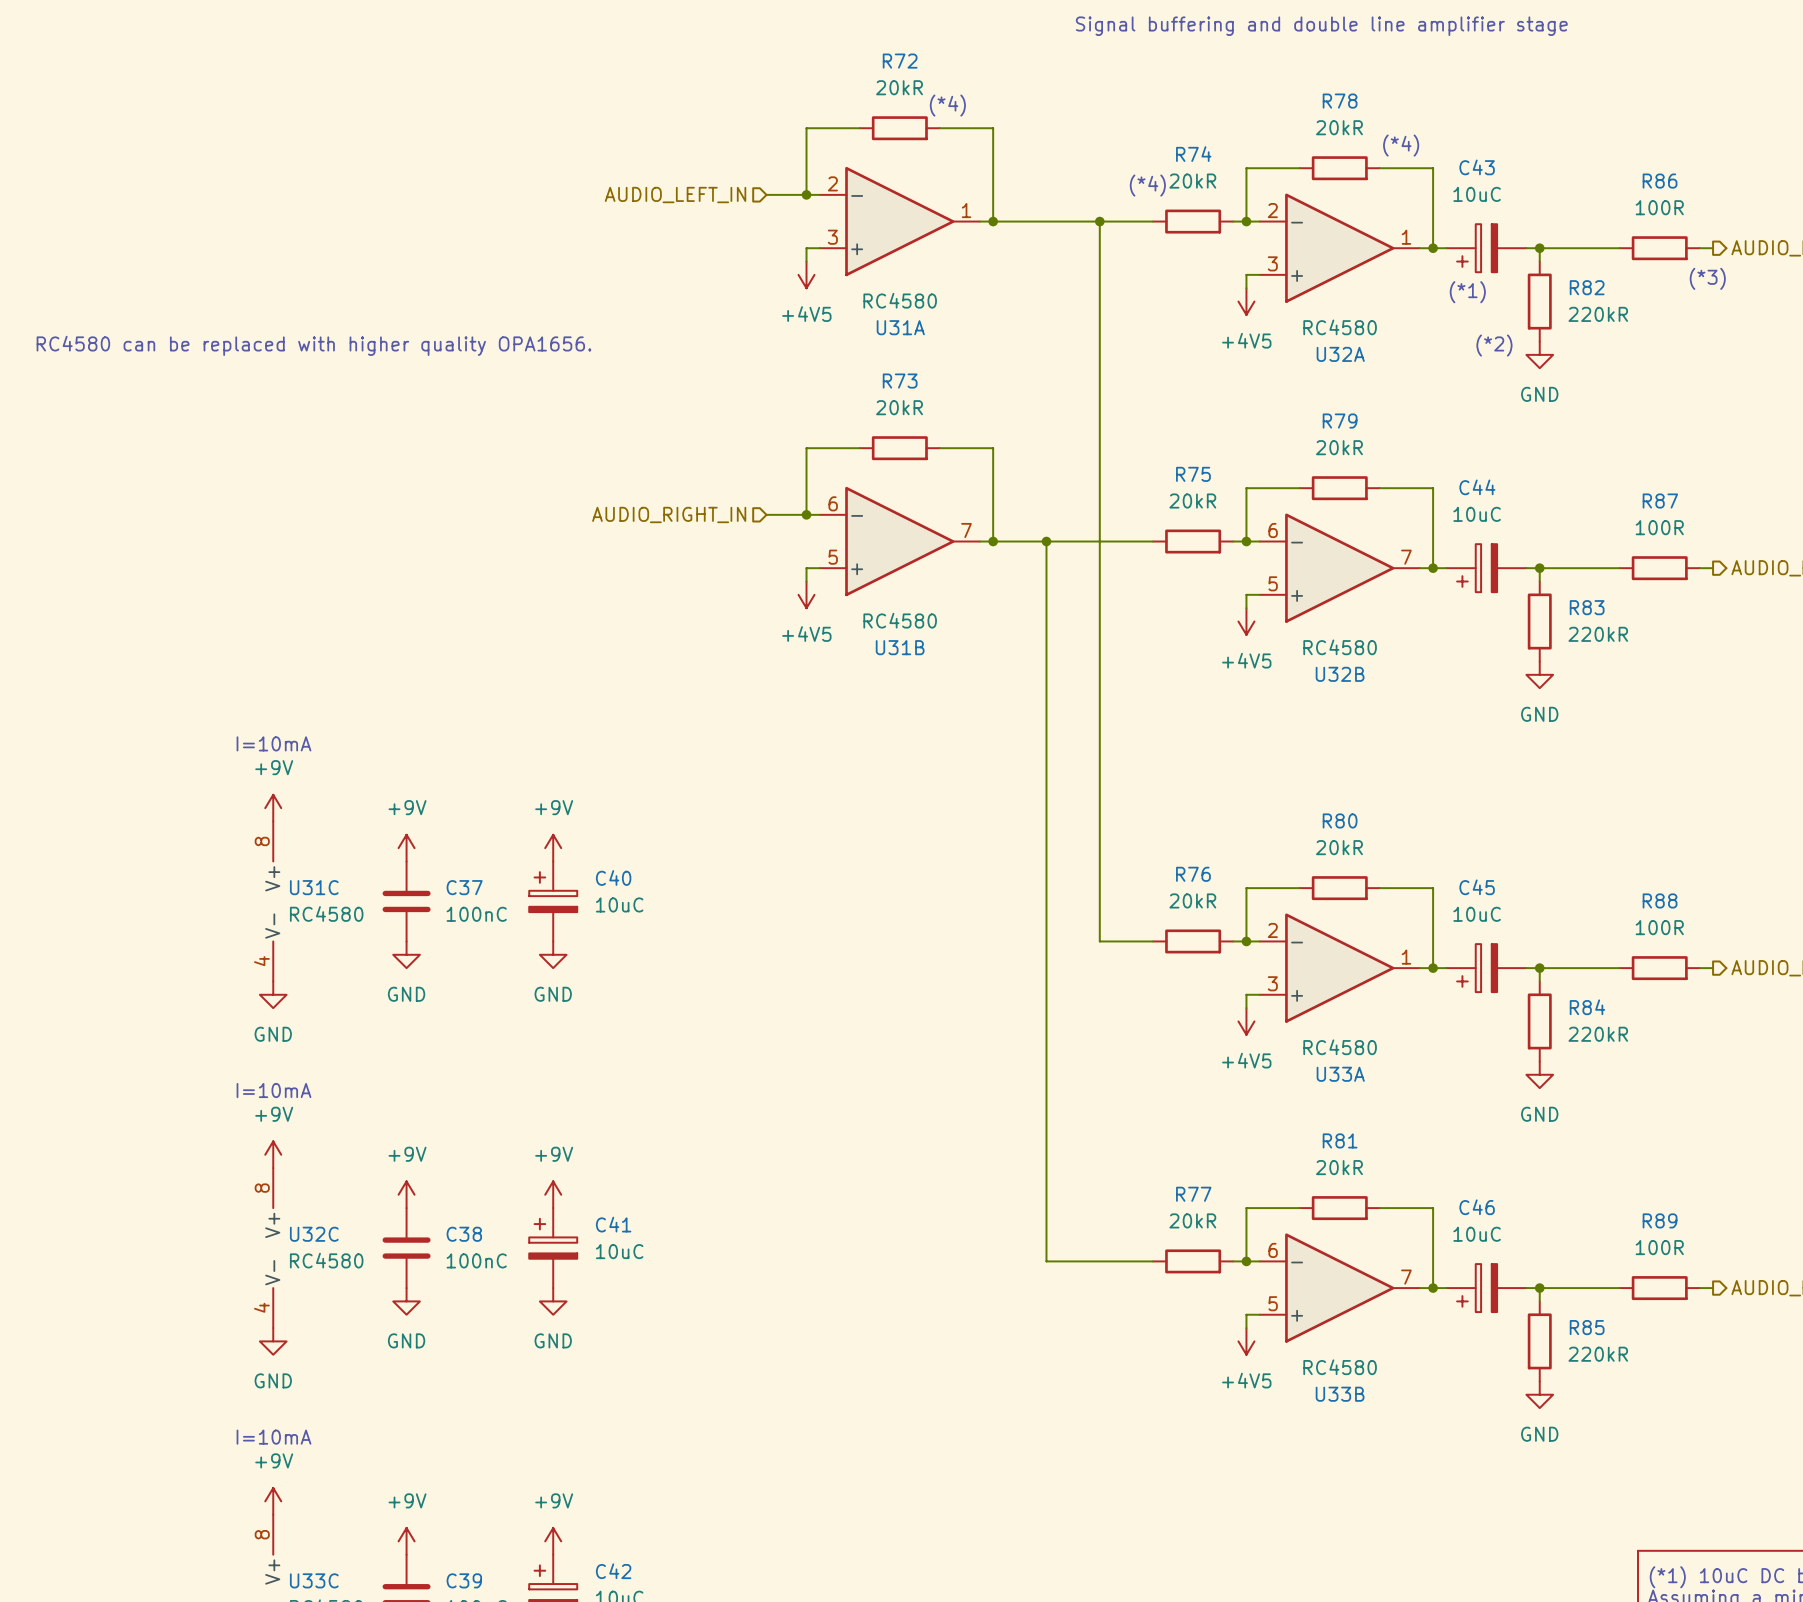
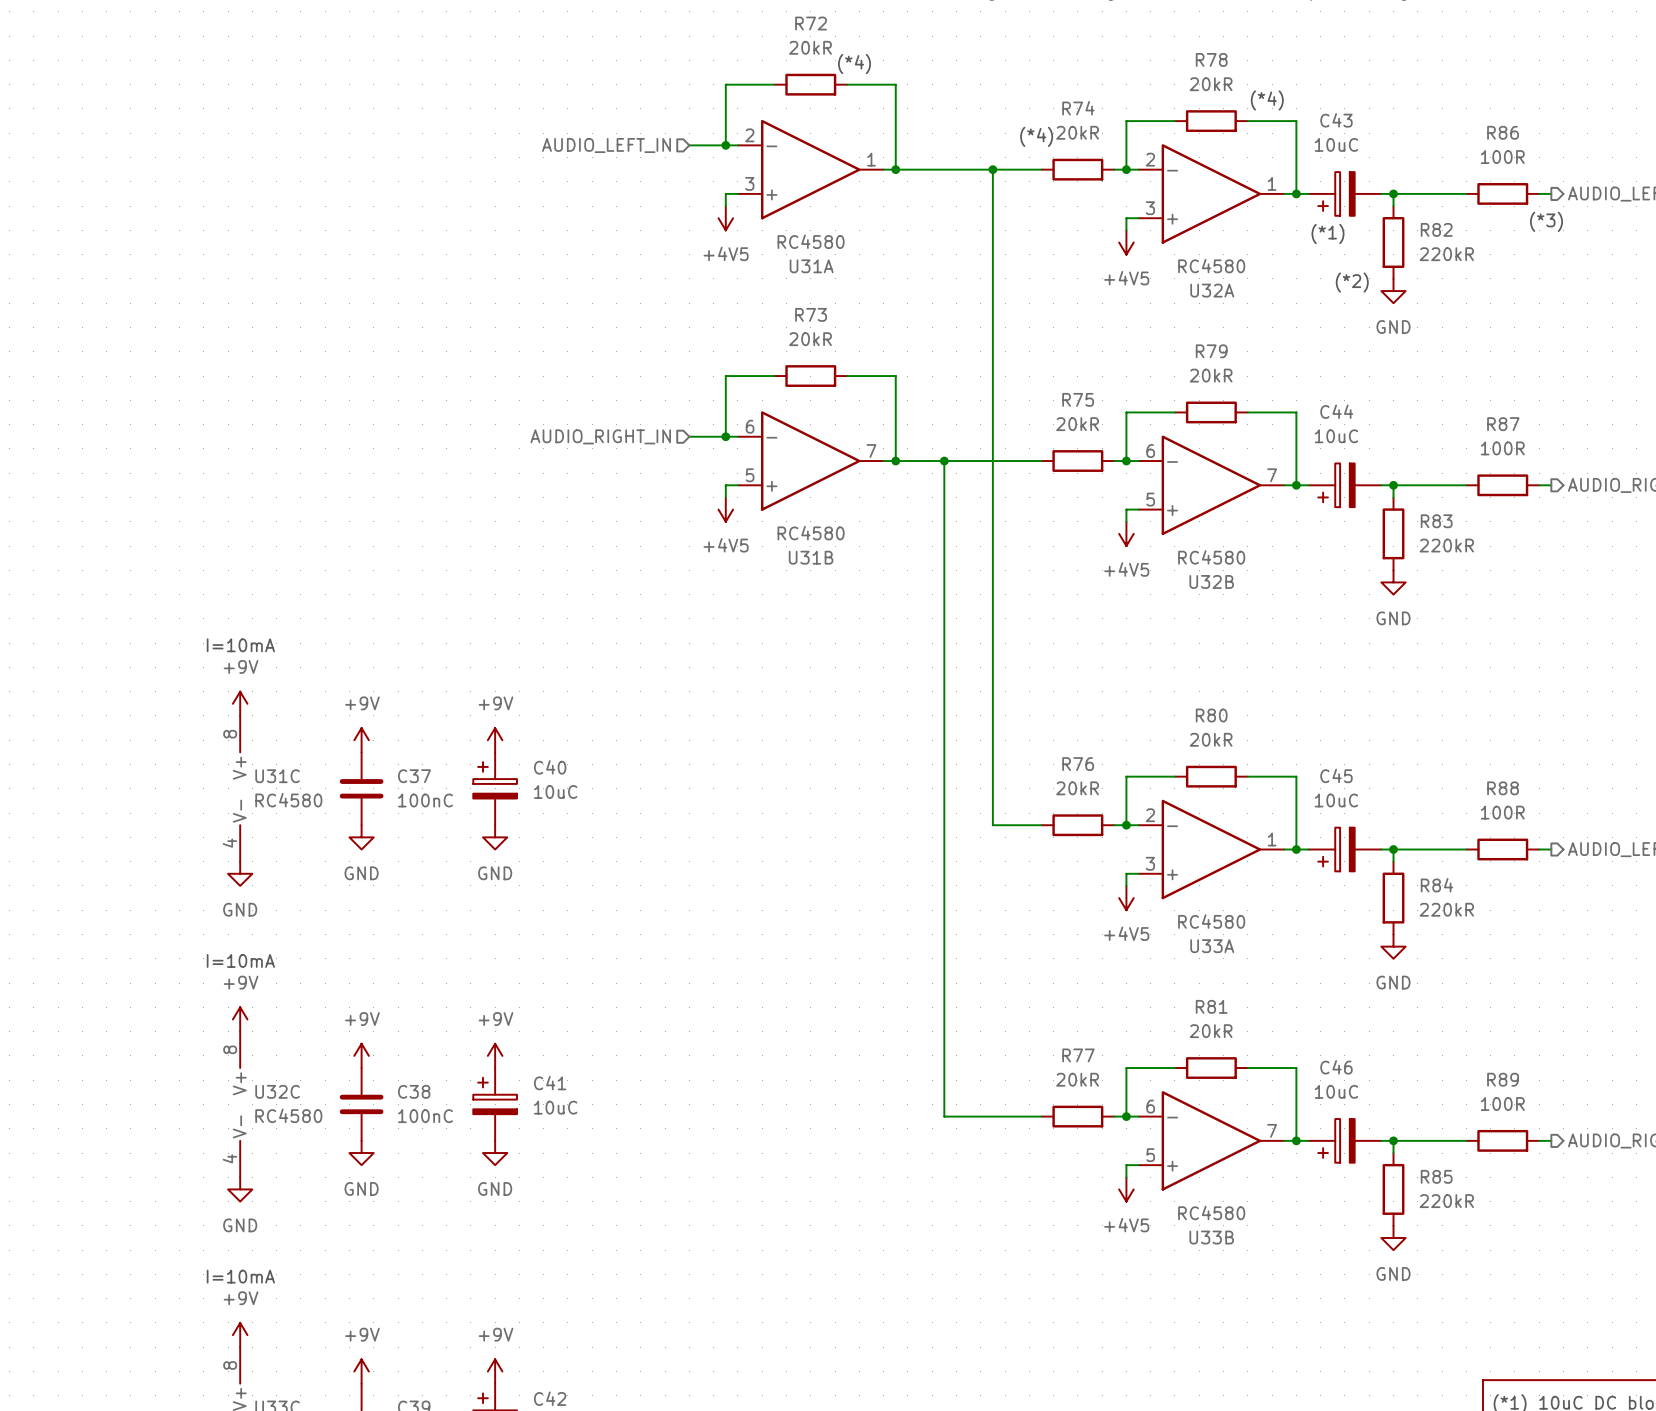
text: RC4580 can be replaced with higher quality OPA1656. (313, 345) -> none

